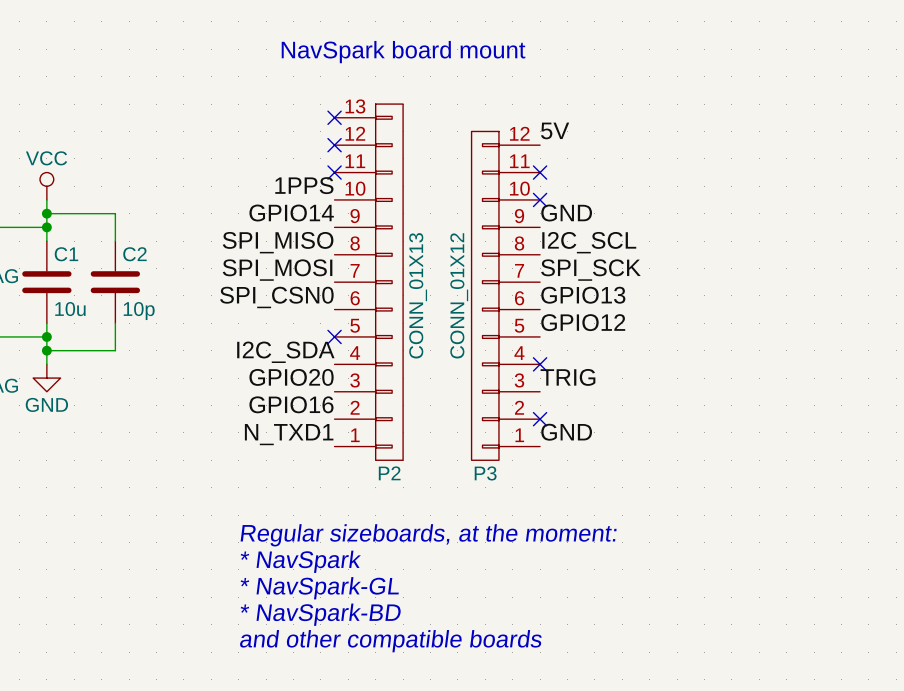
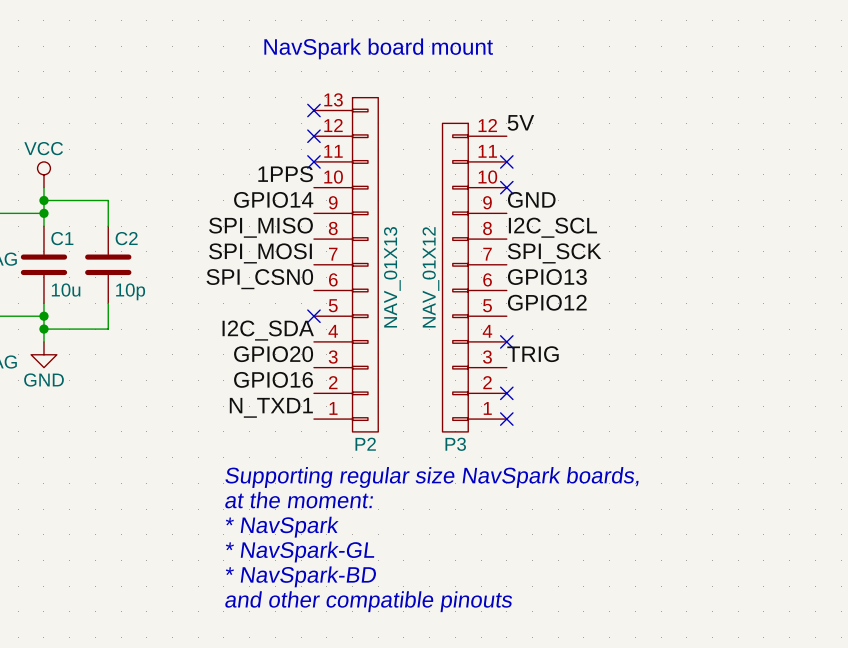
P2 value: CONN_01X13 (418, 295) -> NAV_01X13 (392, 277)
P3 value: CONN_01X12 (459, 295) -> NAV_01X12 (430, 277)
label: GND (566, 432) -> none
no-connect mark: none -> (506, 419)
text: none -> Supporting regular size NavSpark boards, (432, 477)
text: Regular sizeboards, at the moment: (428, 535) -> at the moment: (299, 500)
text: and other compatible boards (390, 641) -> and other compatible pinouts (368, 601)

